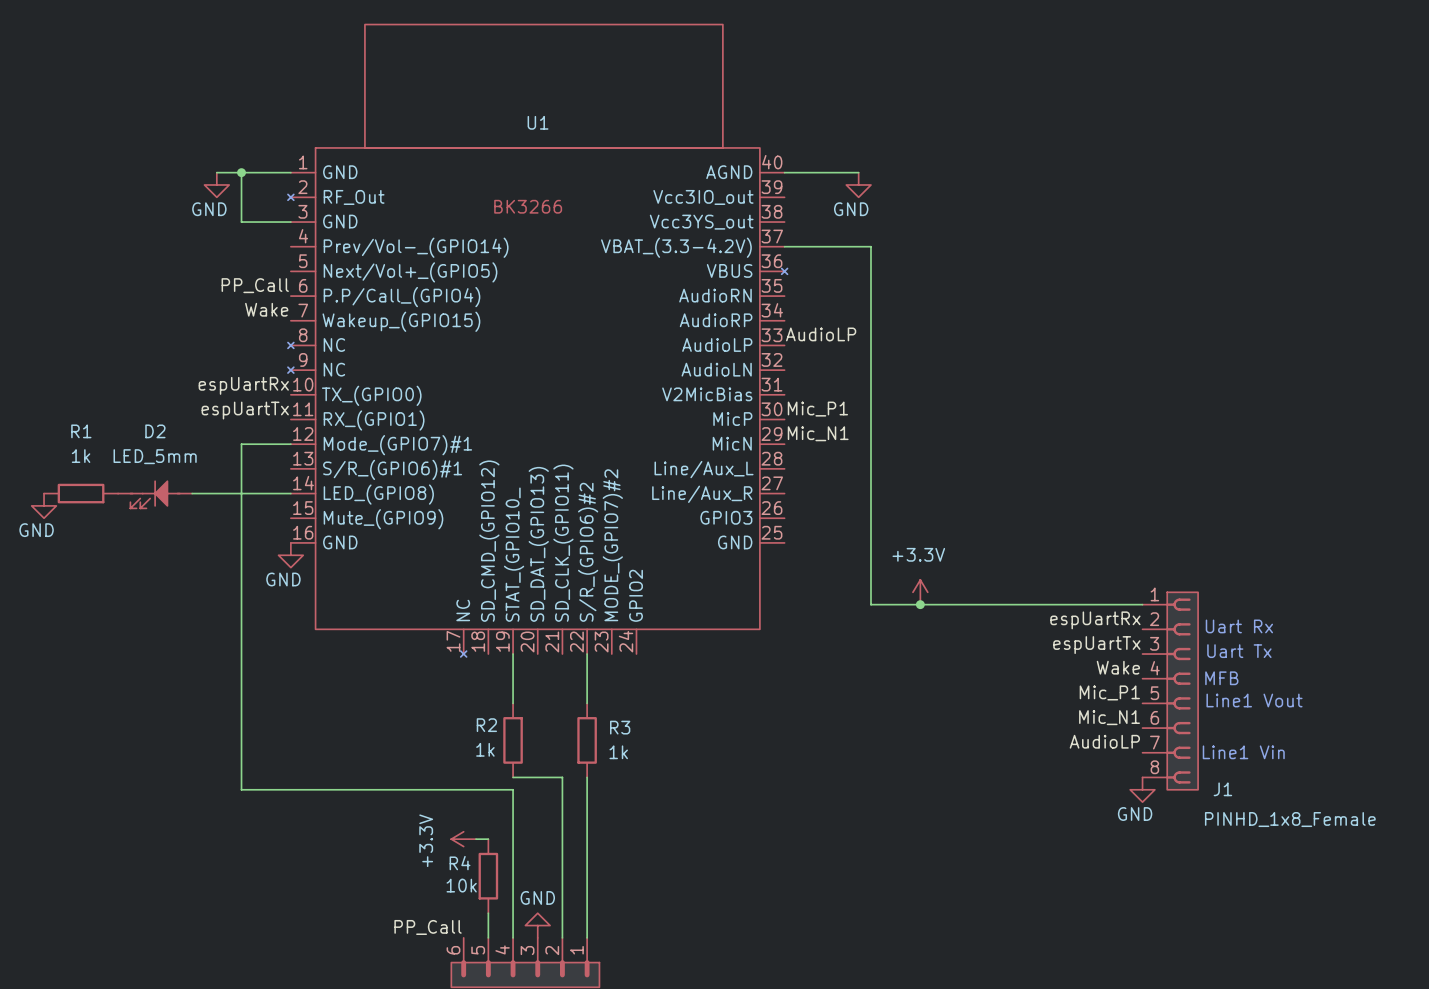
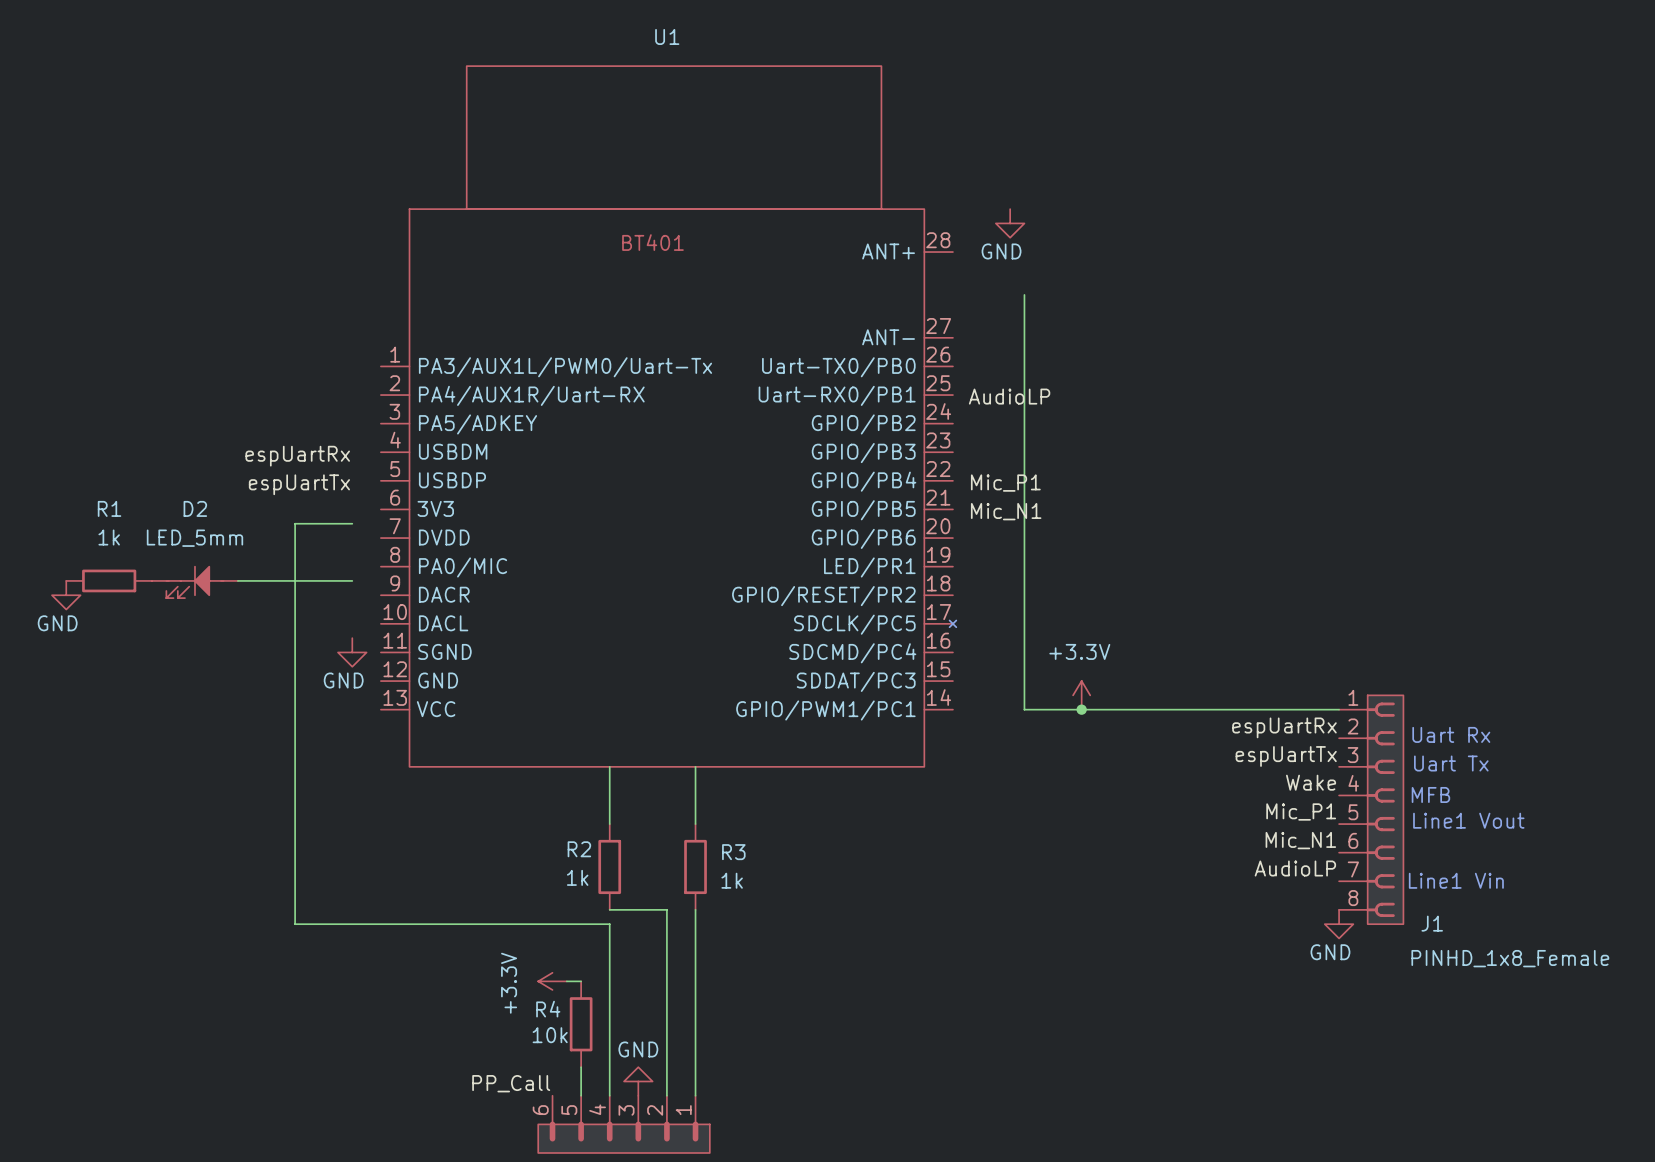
U1 symbol: [287, 24, 788, 657] -> [380, 66, 957, 767]
U1 name position: U1 (538, 122) -> U1 (667, 36)
wire: (216, 172) (290, 172) -> none
wire: (241, 172) (241, 222) (290, 222) -> none
junction: (241, 172) -> none
wire: (784, 172) (858, 172) -> none
power symbol: GND (216, 184) -> none
wire: (784, 246) (870, 246) -> none
label: PP_Call (255, 285) -> none
label: Wake (266, 309) -> none
label position: AudioLP (821, 334) -> AudioLP (1009, 396)
label position: Mic_P1 (817, 409) -> Mic_P1 (1005, 483)
label position: Mic_N1 (818, 433) -> Mic_N1 (1006, 511)

